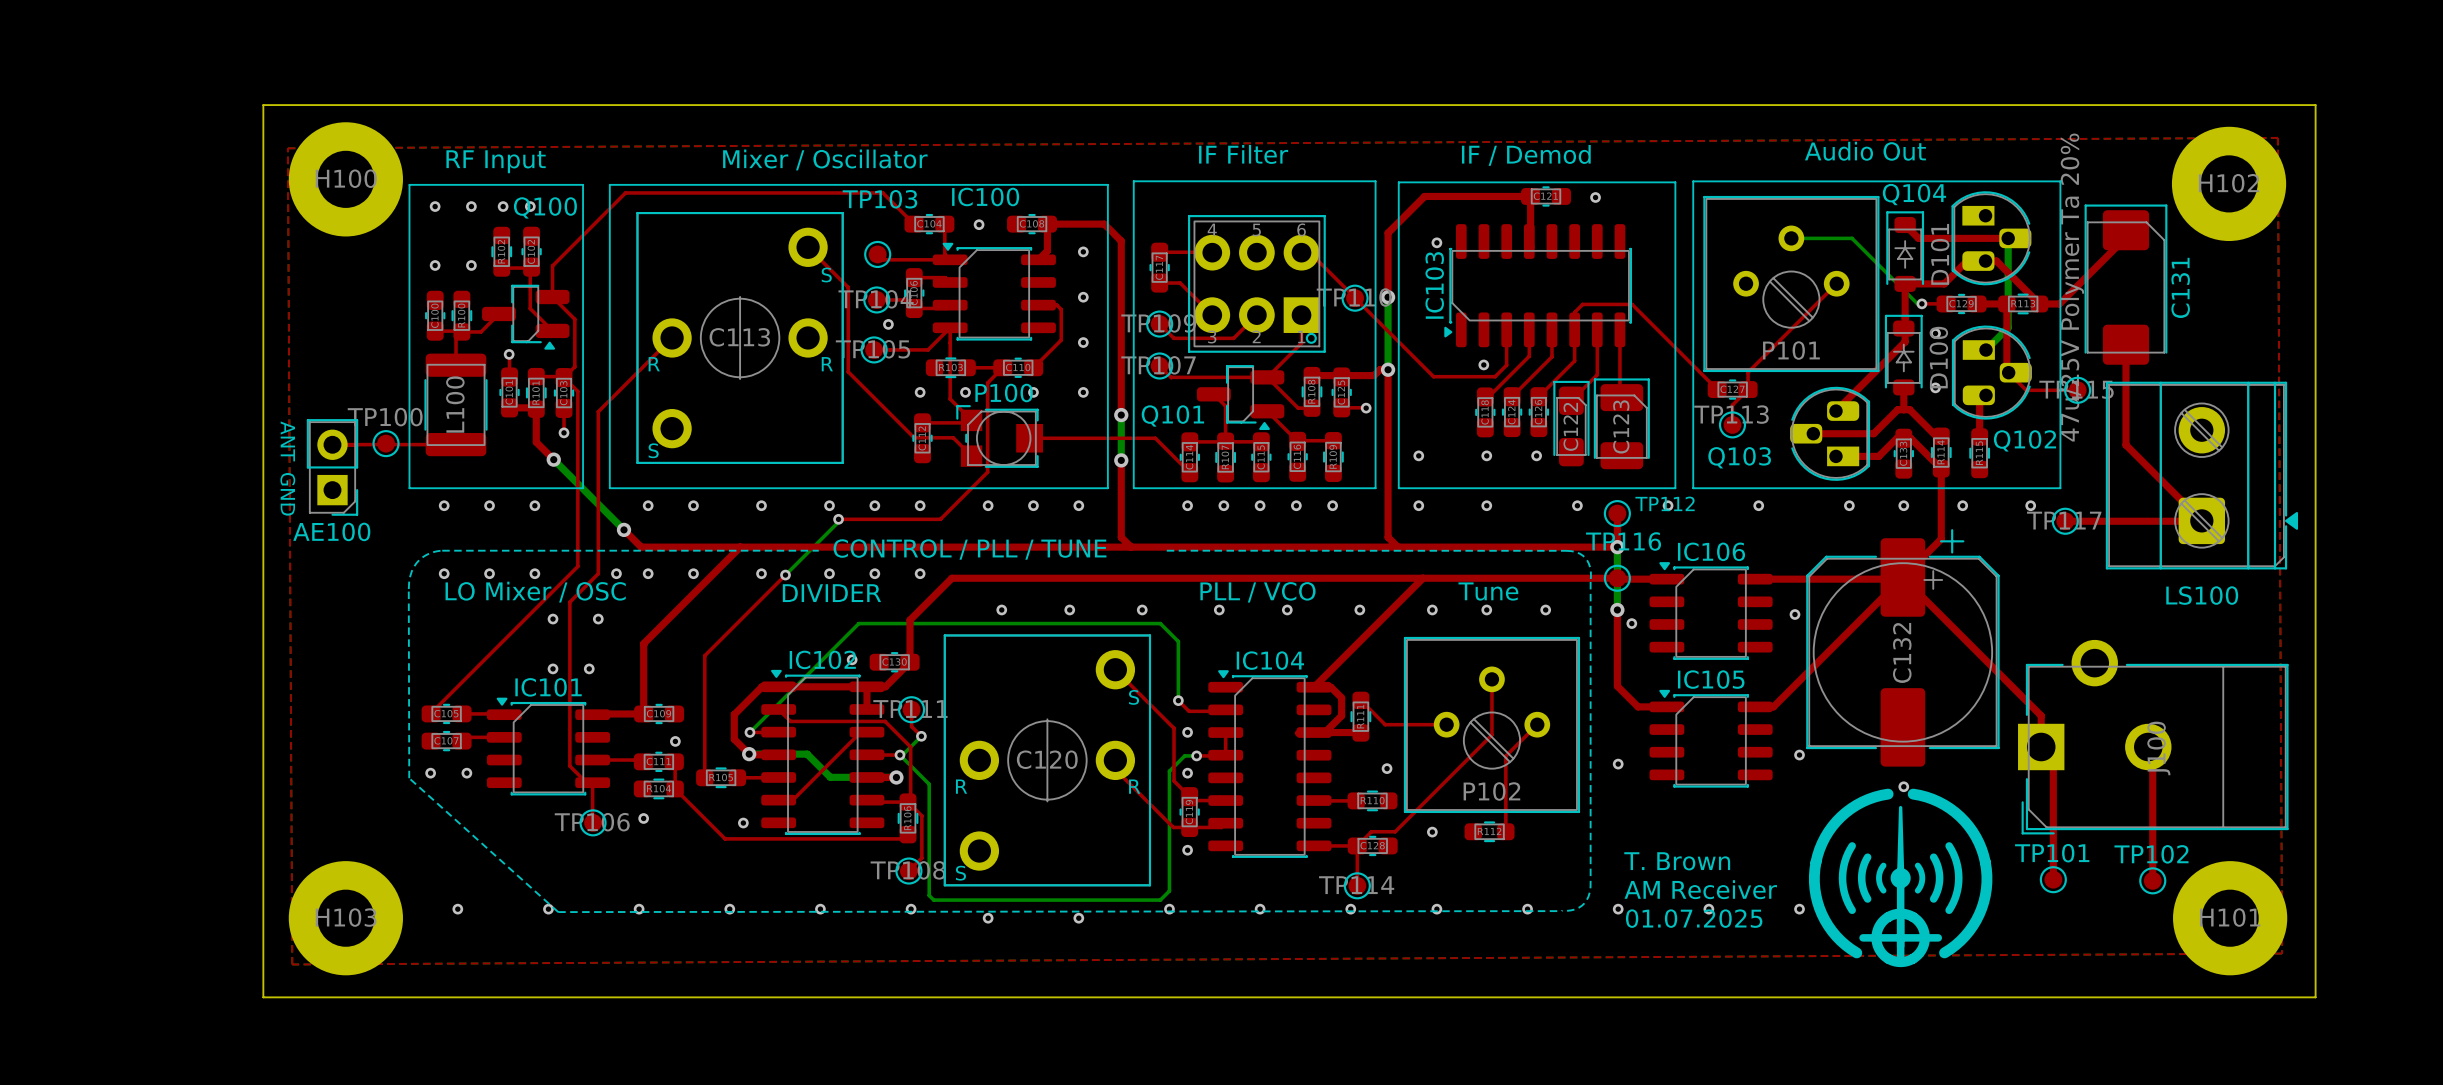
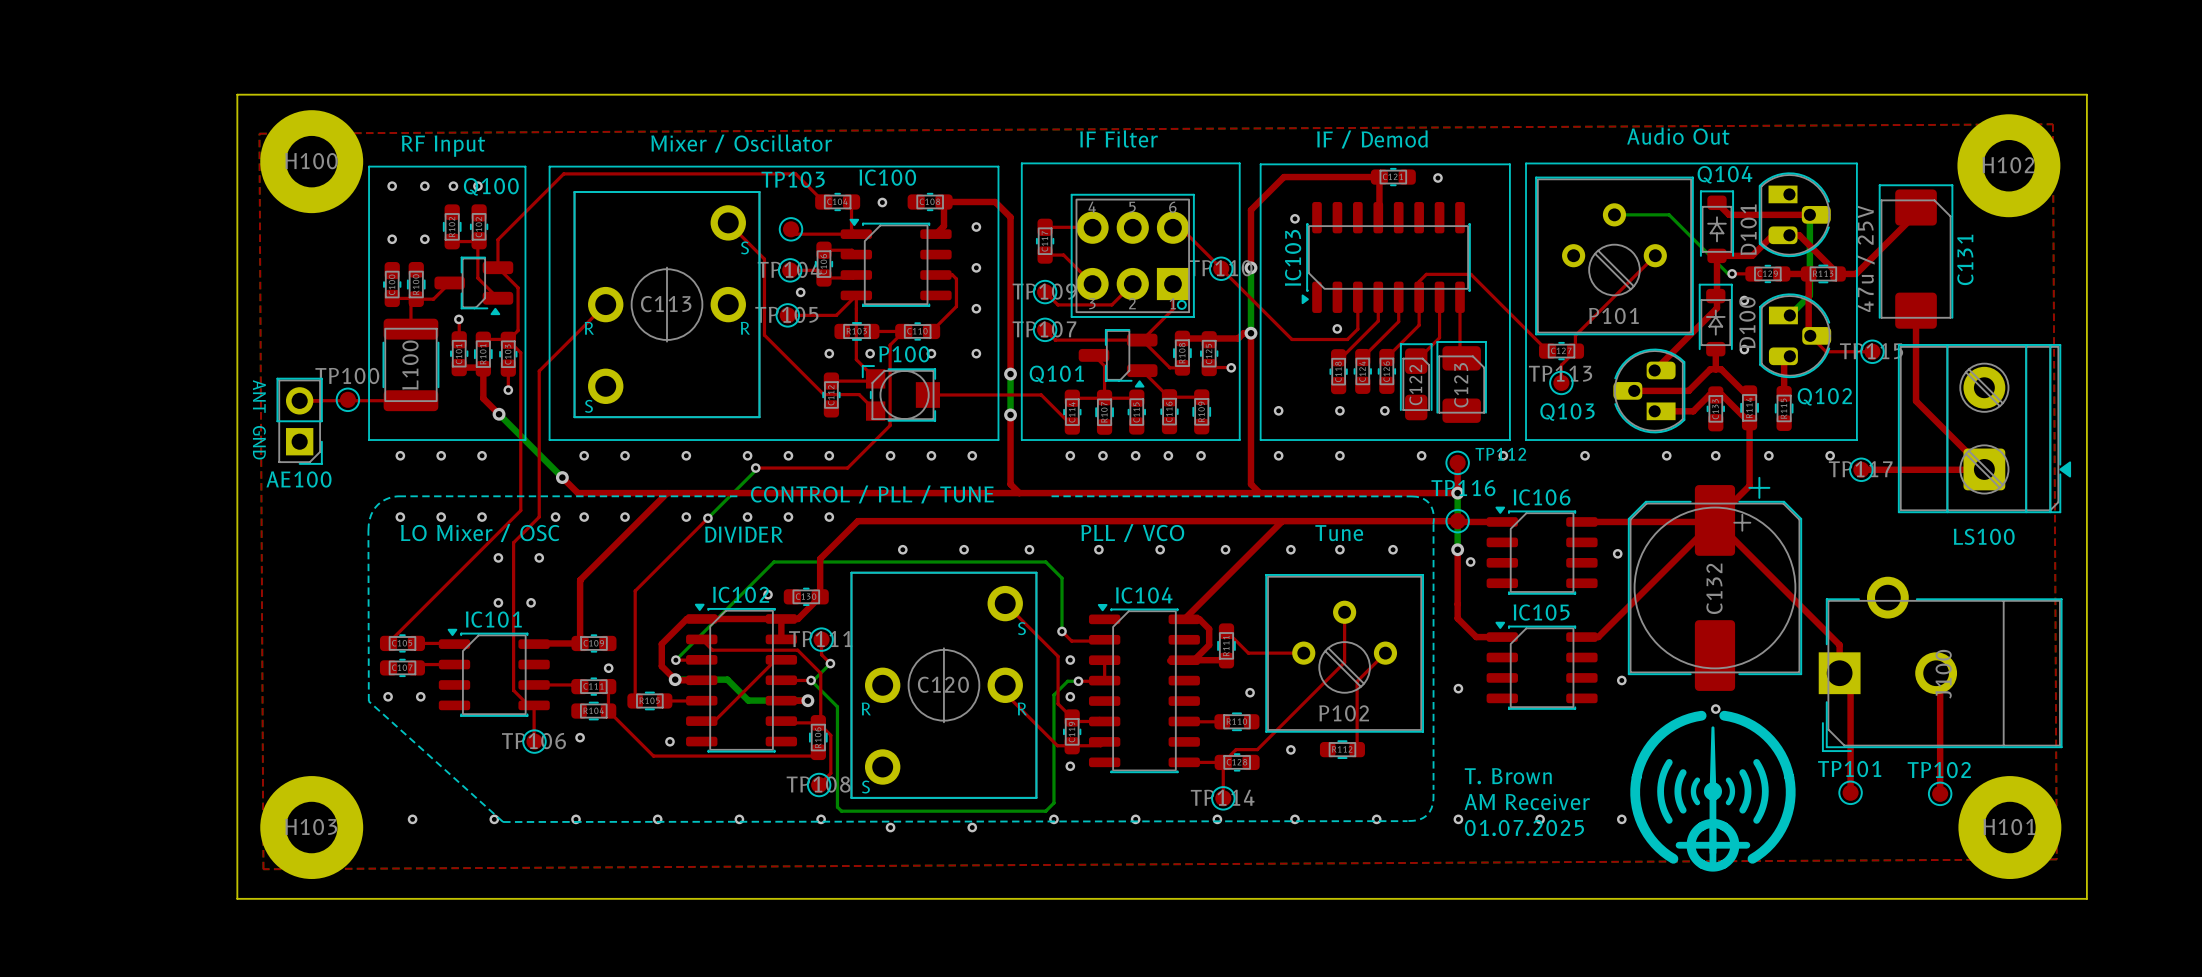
C131 value: 47u/25V Polymer Ta 20% (2072, 287) -> 47u / 25V (1865, 258)

